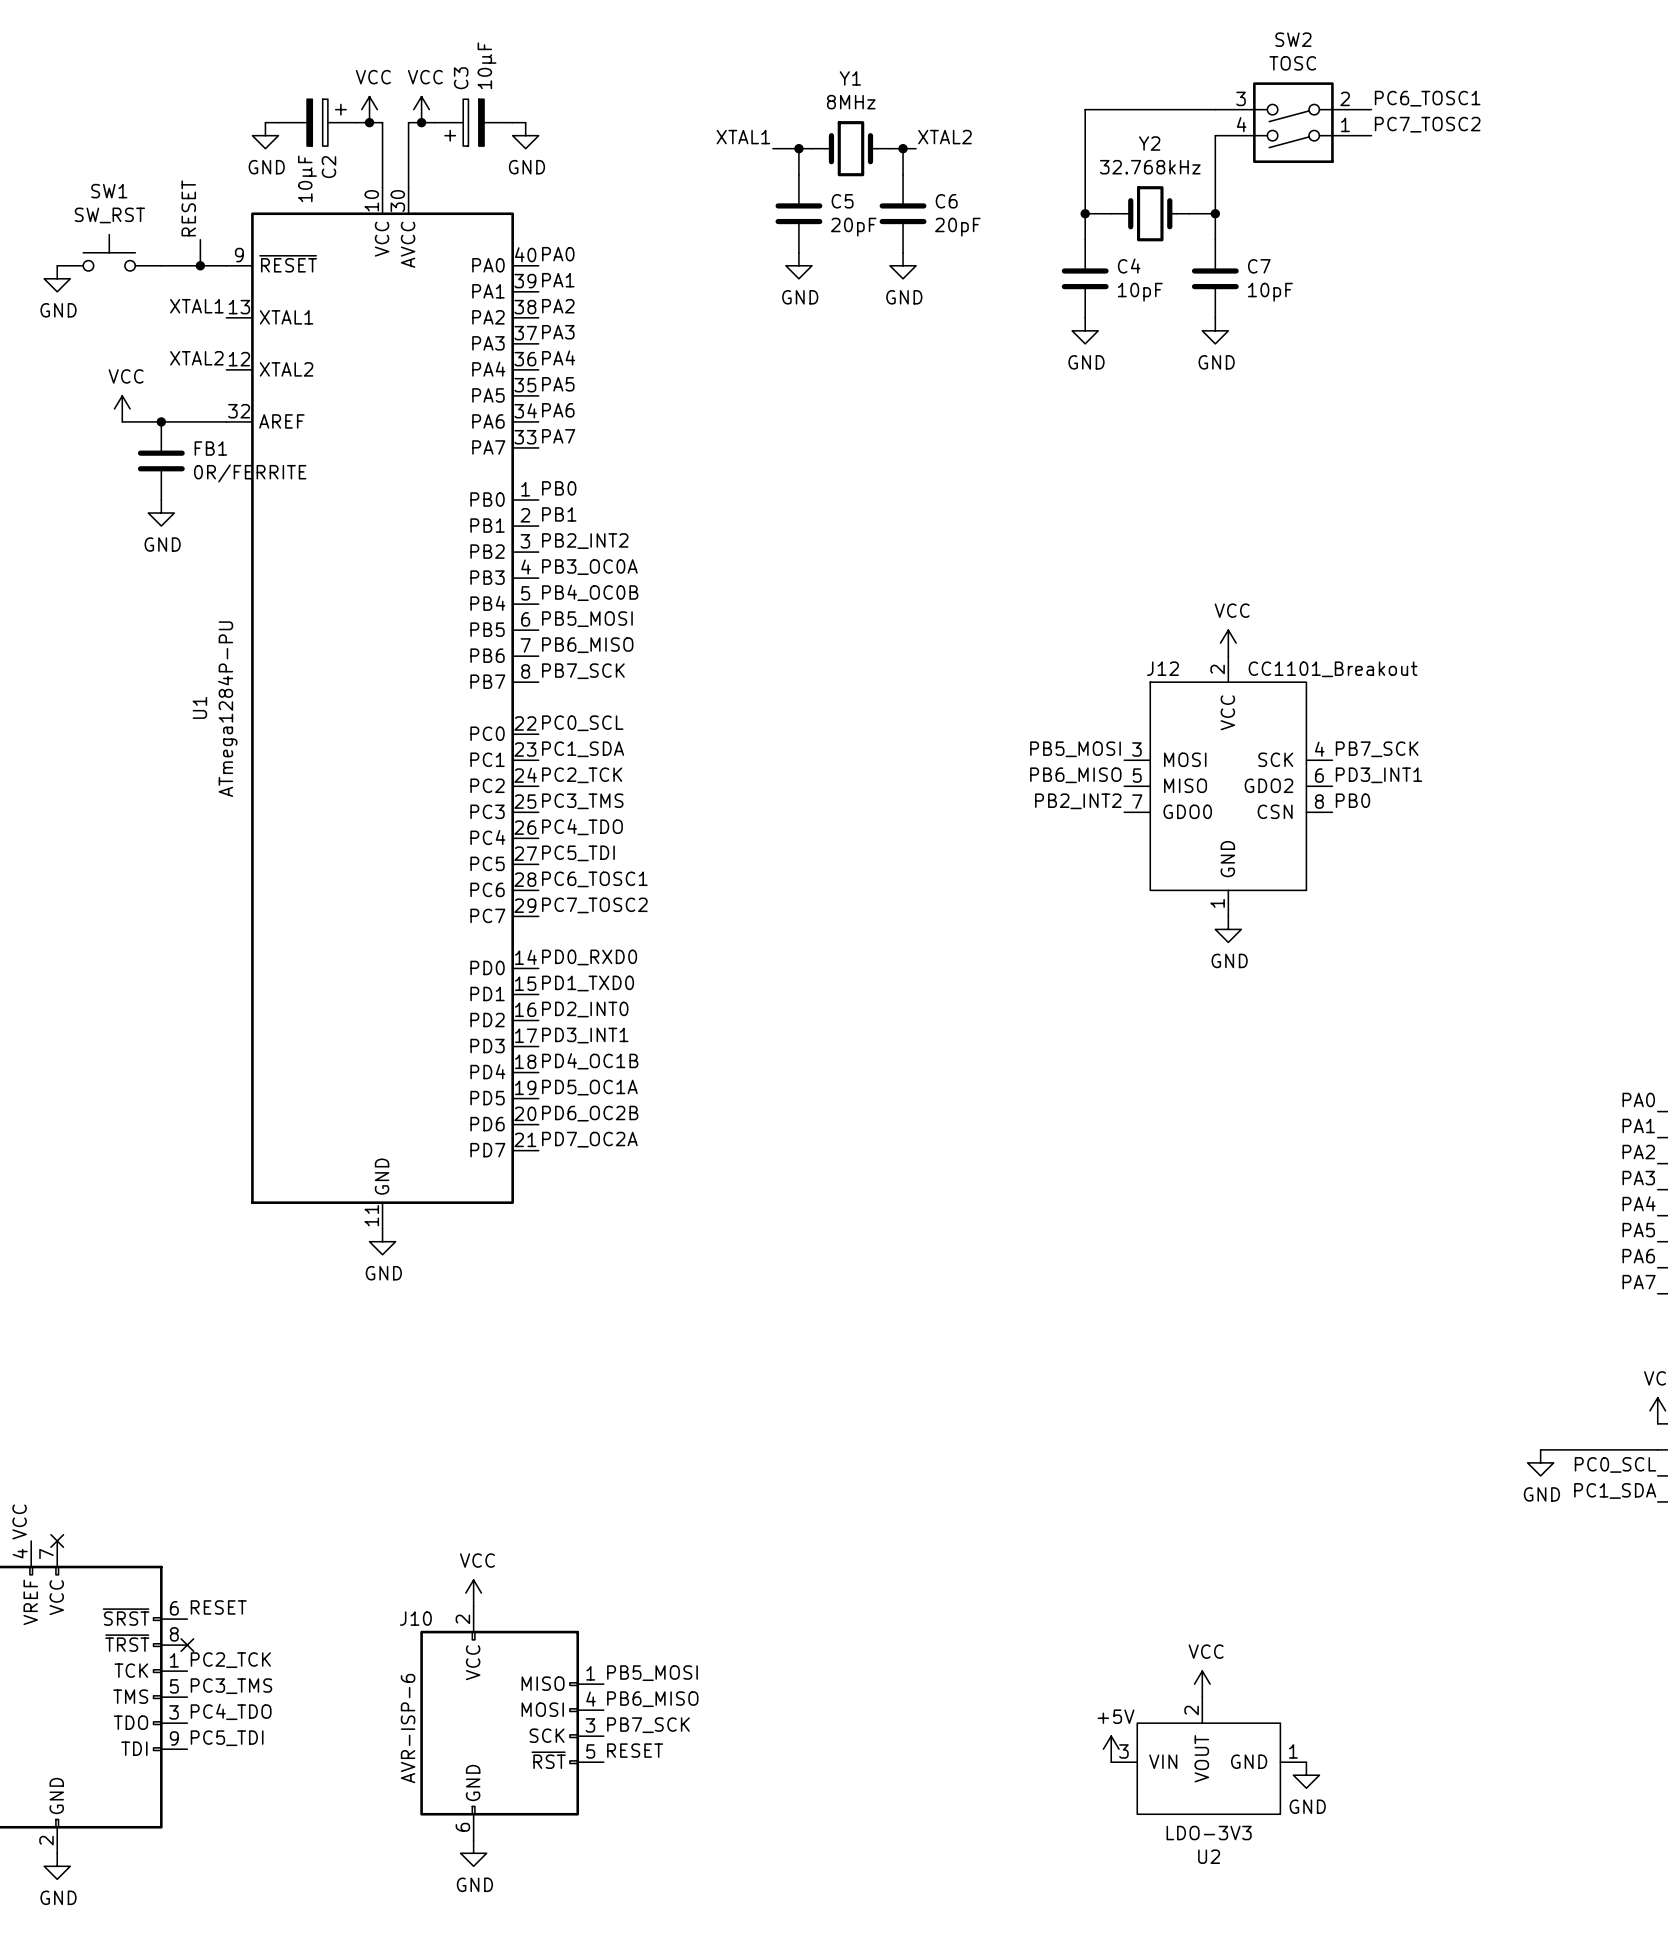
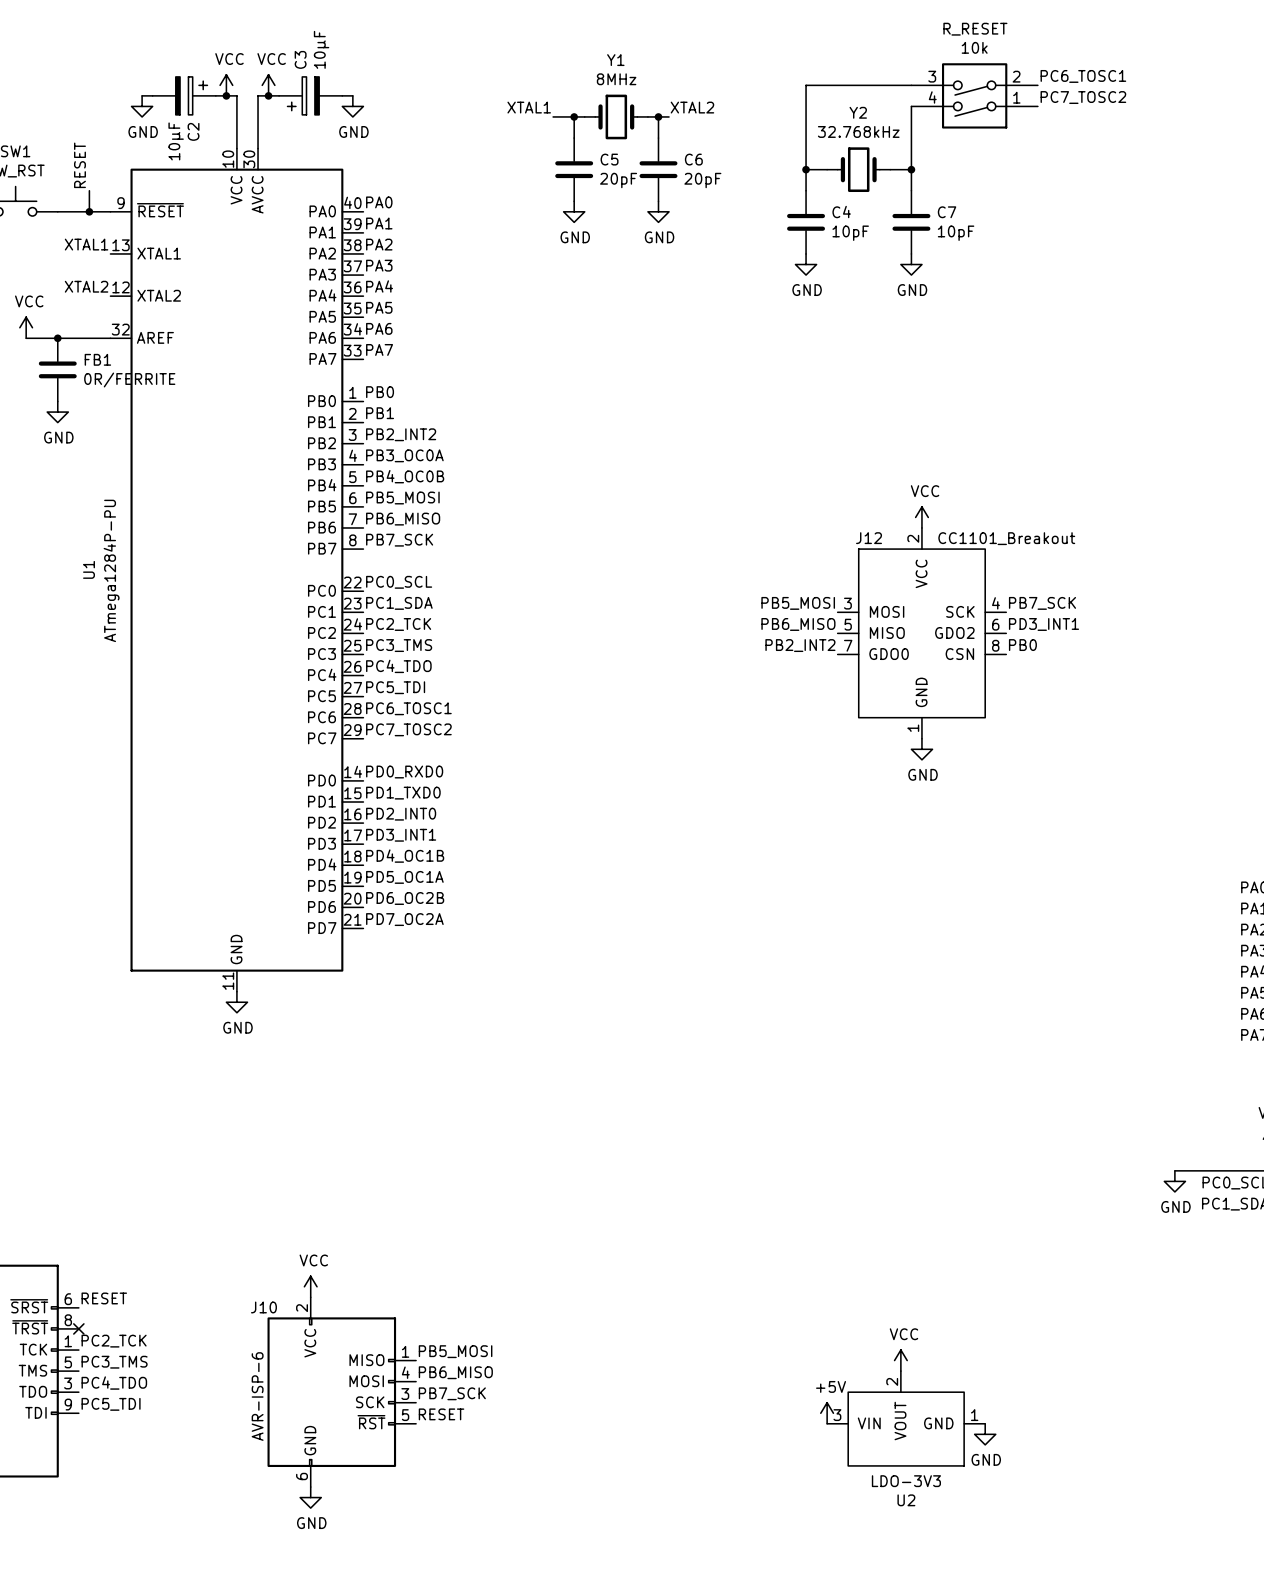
SW2 name: SW2 (1293, 39) -> R_RESET (975, 29)
SW2 value: TOSC (1292, 63) -> 10k (974, 47)

